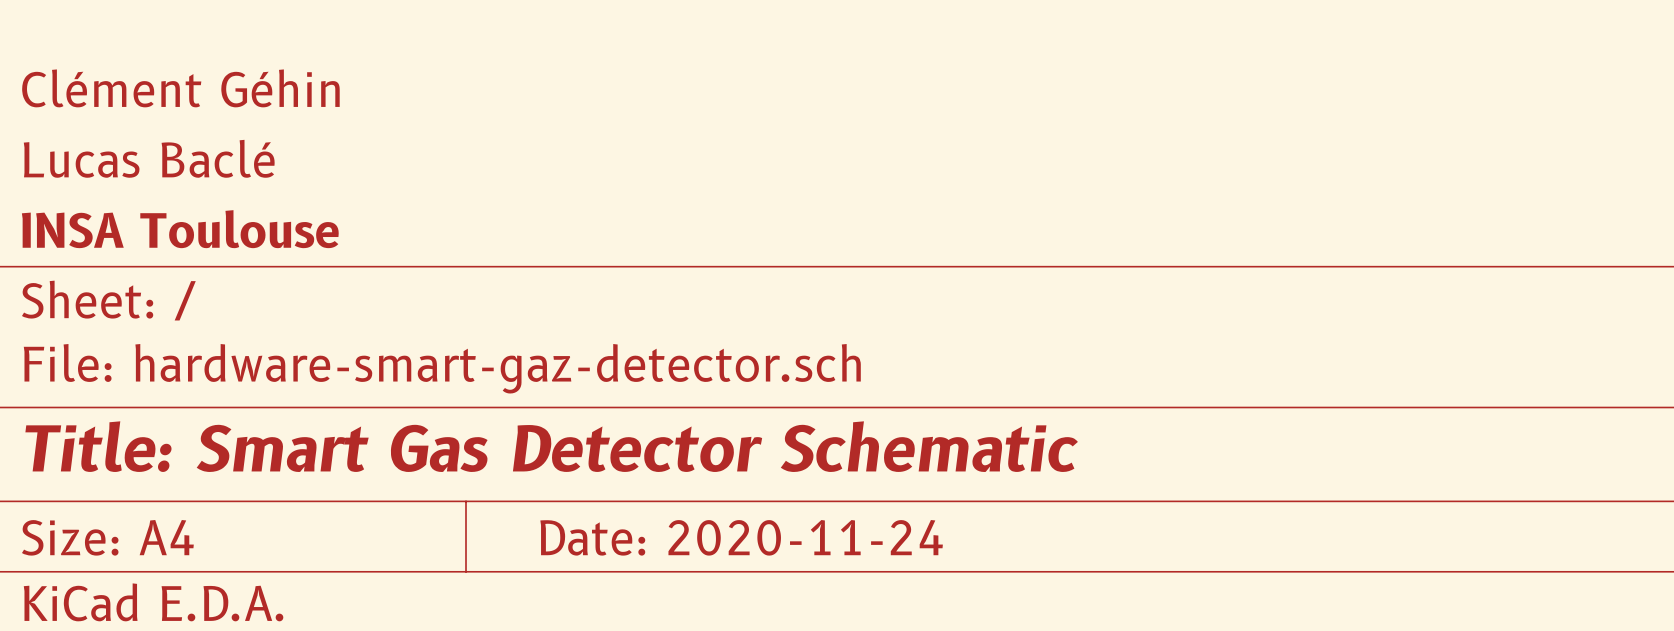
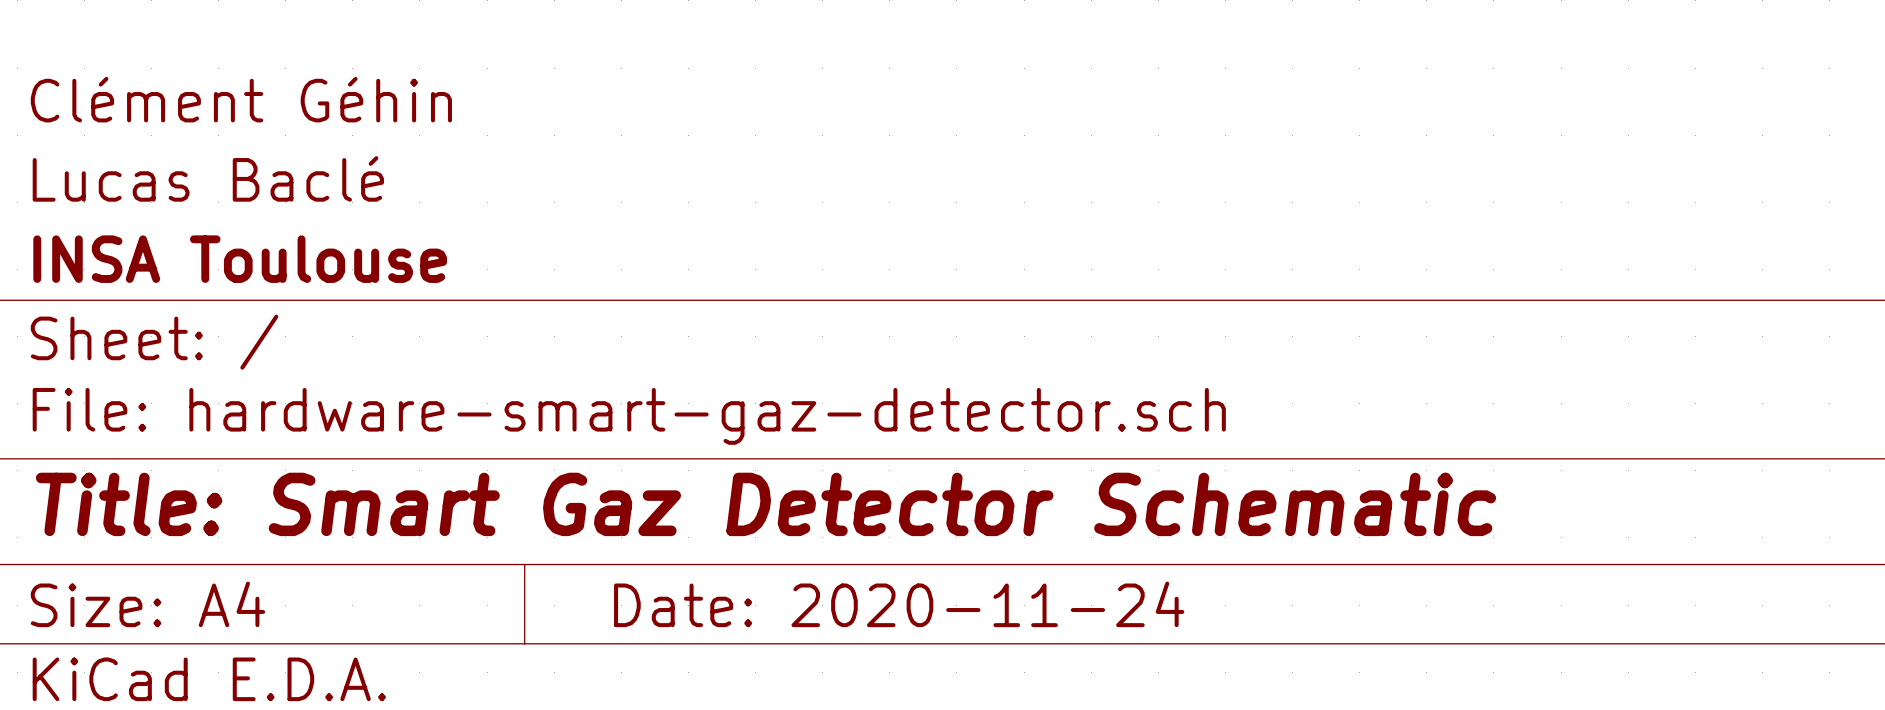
title block: Title: Smart Gas Detector Schematic (551, 446) -> Title: Smart Gaz Detector Schematic (766, 504)

